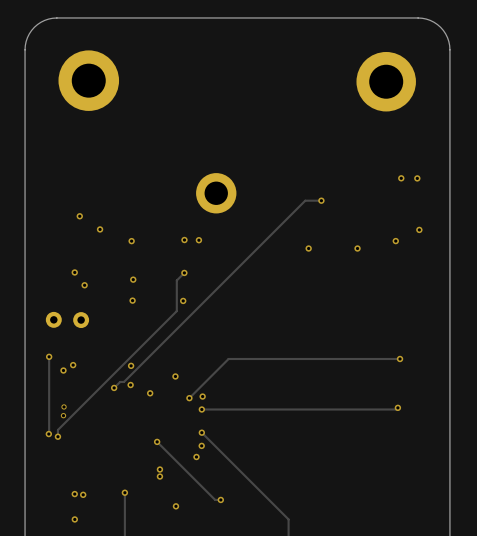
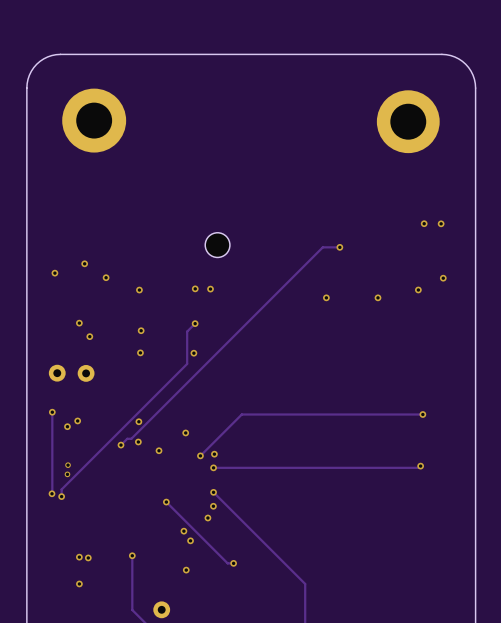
part: (216, 193) -> none
part: none -> (217, 245)
via: none -> (54, 273)
via: (159, 469) -> none
via: none -> (183, 531)
via: (159, 476) -> none
via: none -> (190, 540)

